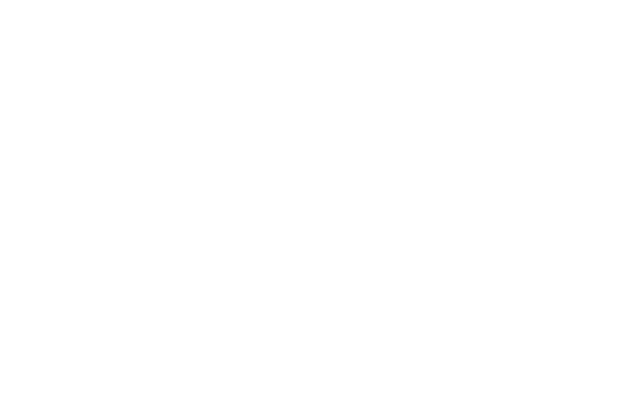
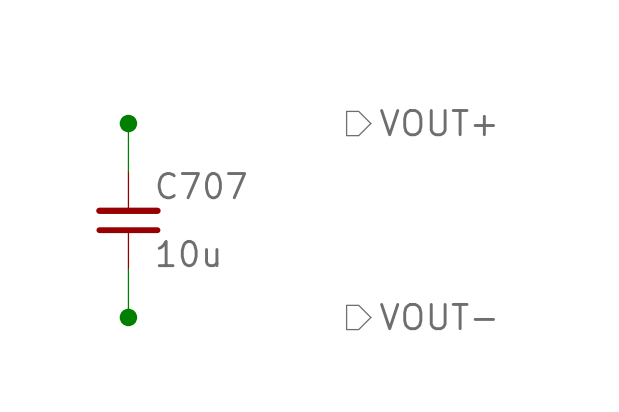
hierarchical label: none -> VOUT+ (437, 122)
wire: none -> (128, 123) (128, 172)
junction: none -> (128, 123)
C707: none -> 10u (128, 220)
wire: none -> (128, 268) (128, 317)
hierarchical label: none -> VOUT- (437, 316)
junction: none -> (128, 317)

